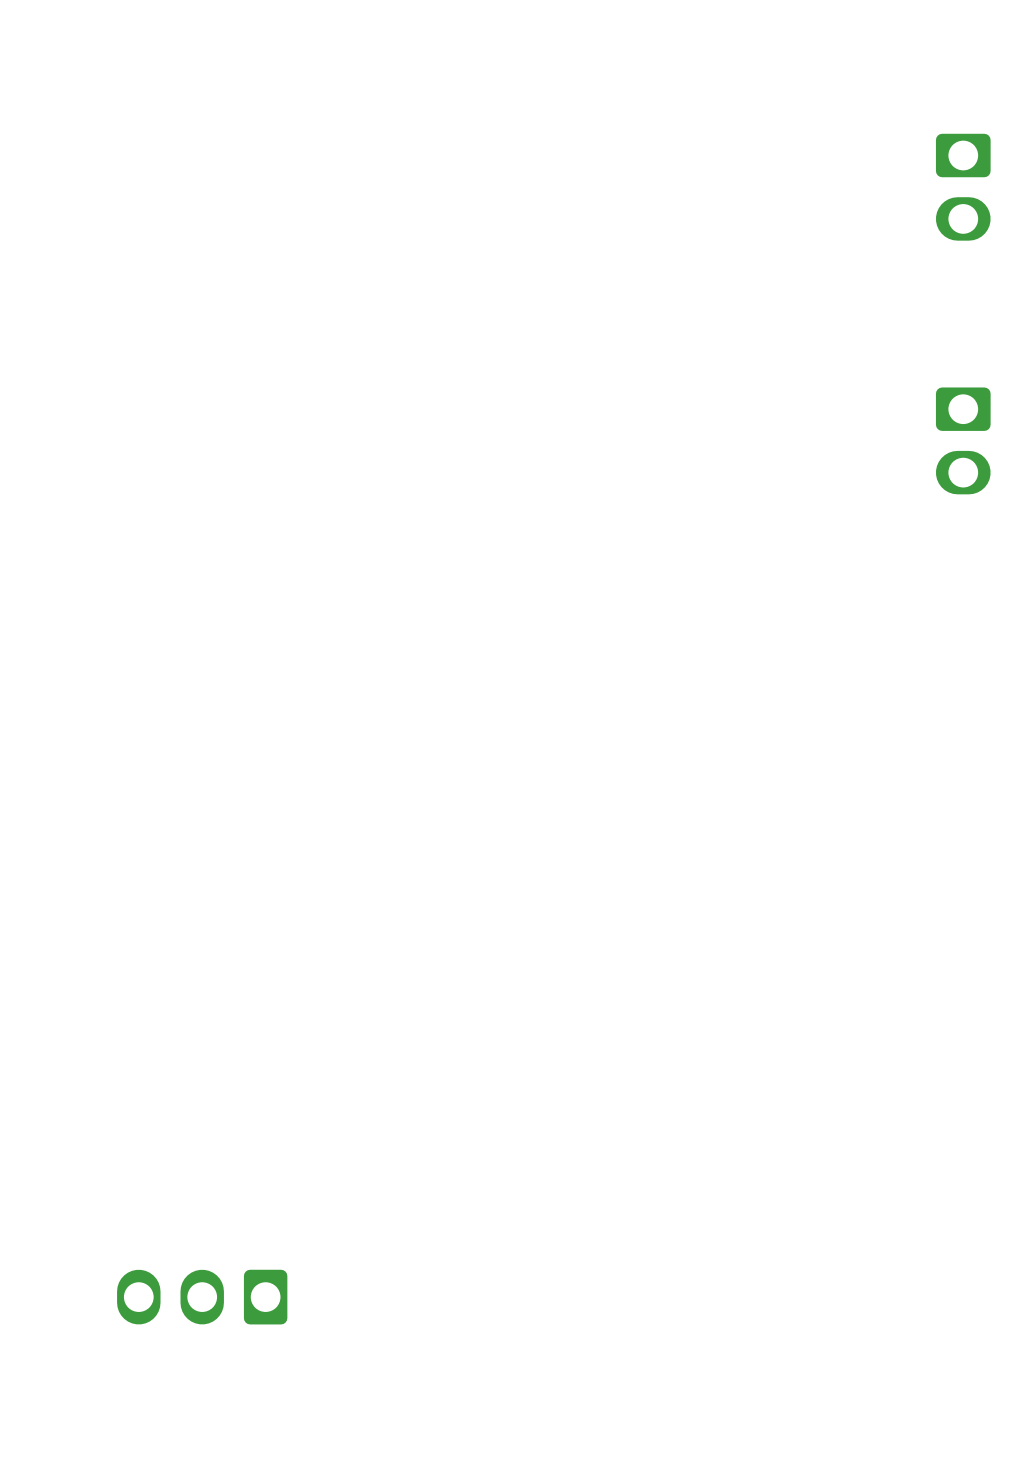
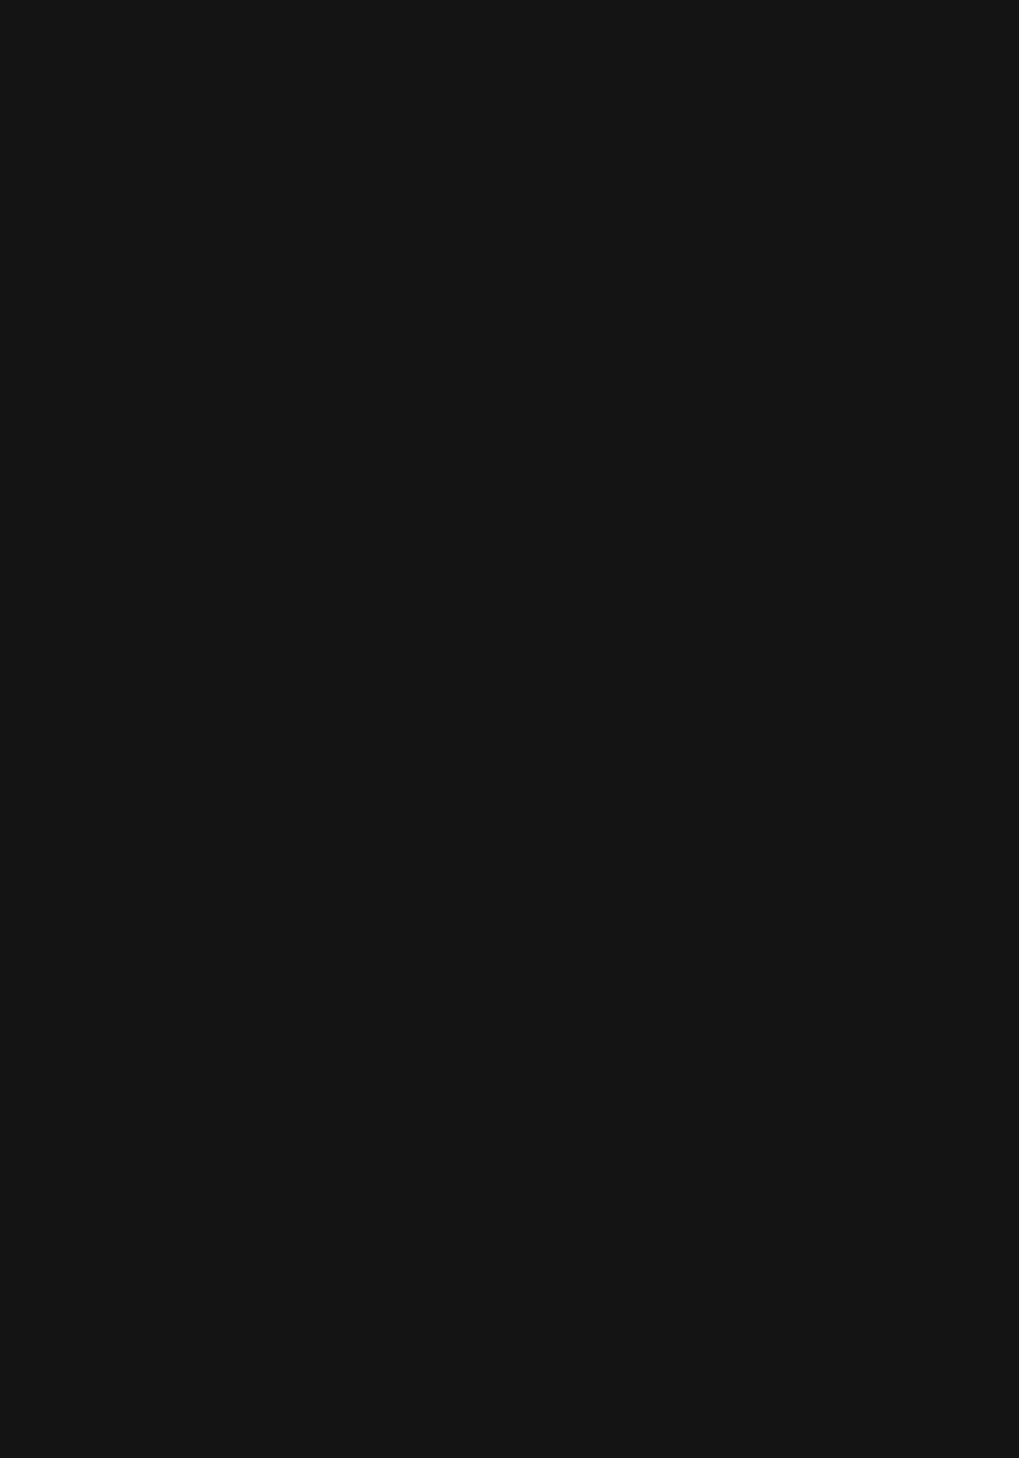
part: (963, 187) -> none
part: (963, 440) -> none
part: (202, 1297) -> none

